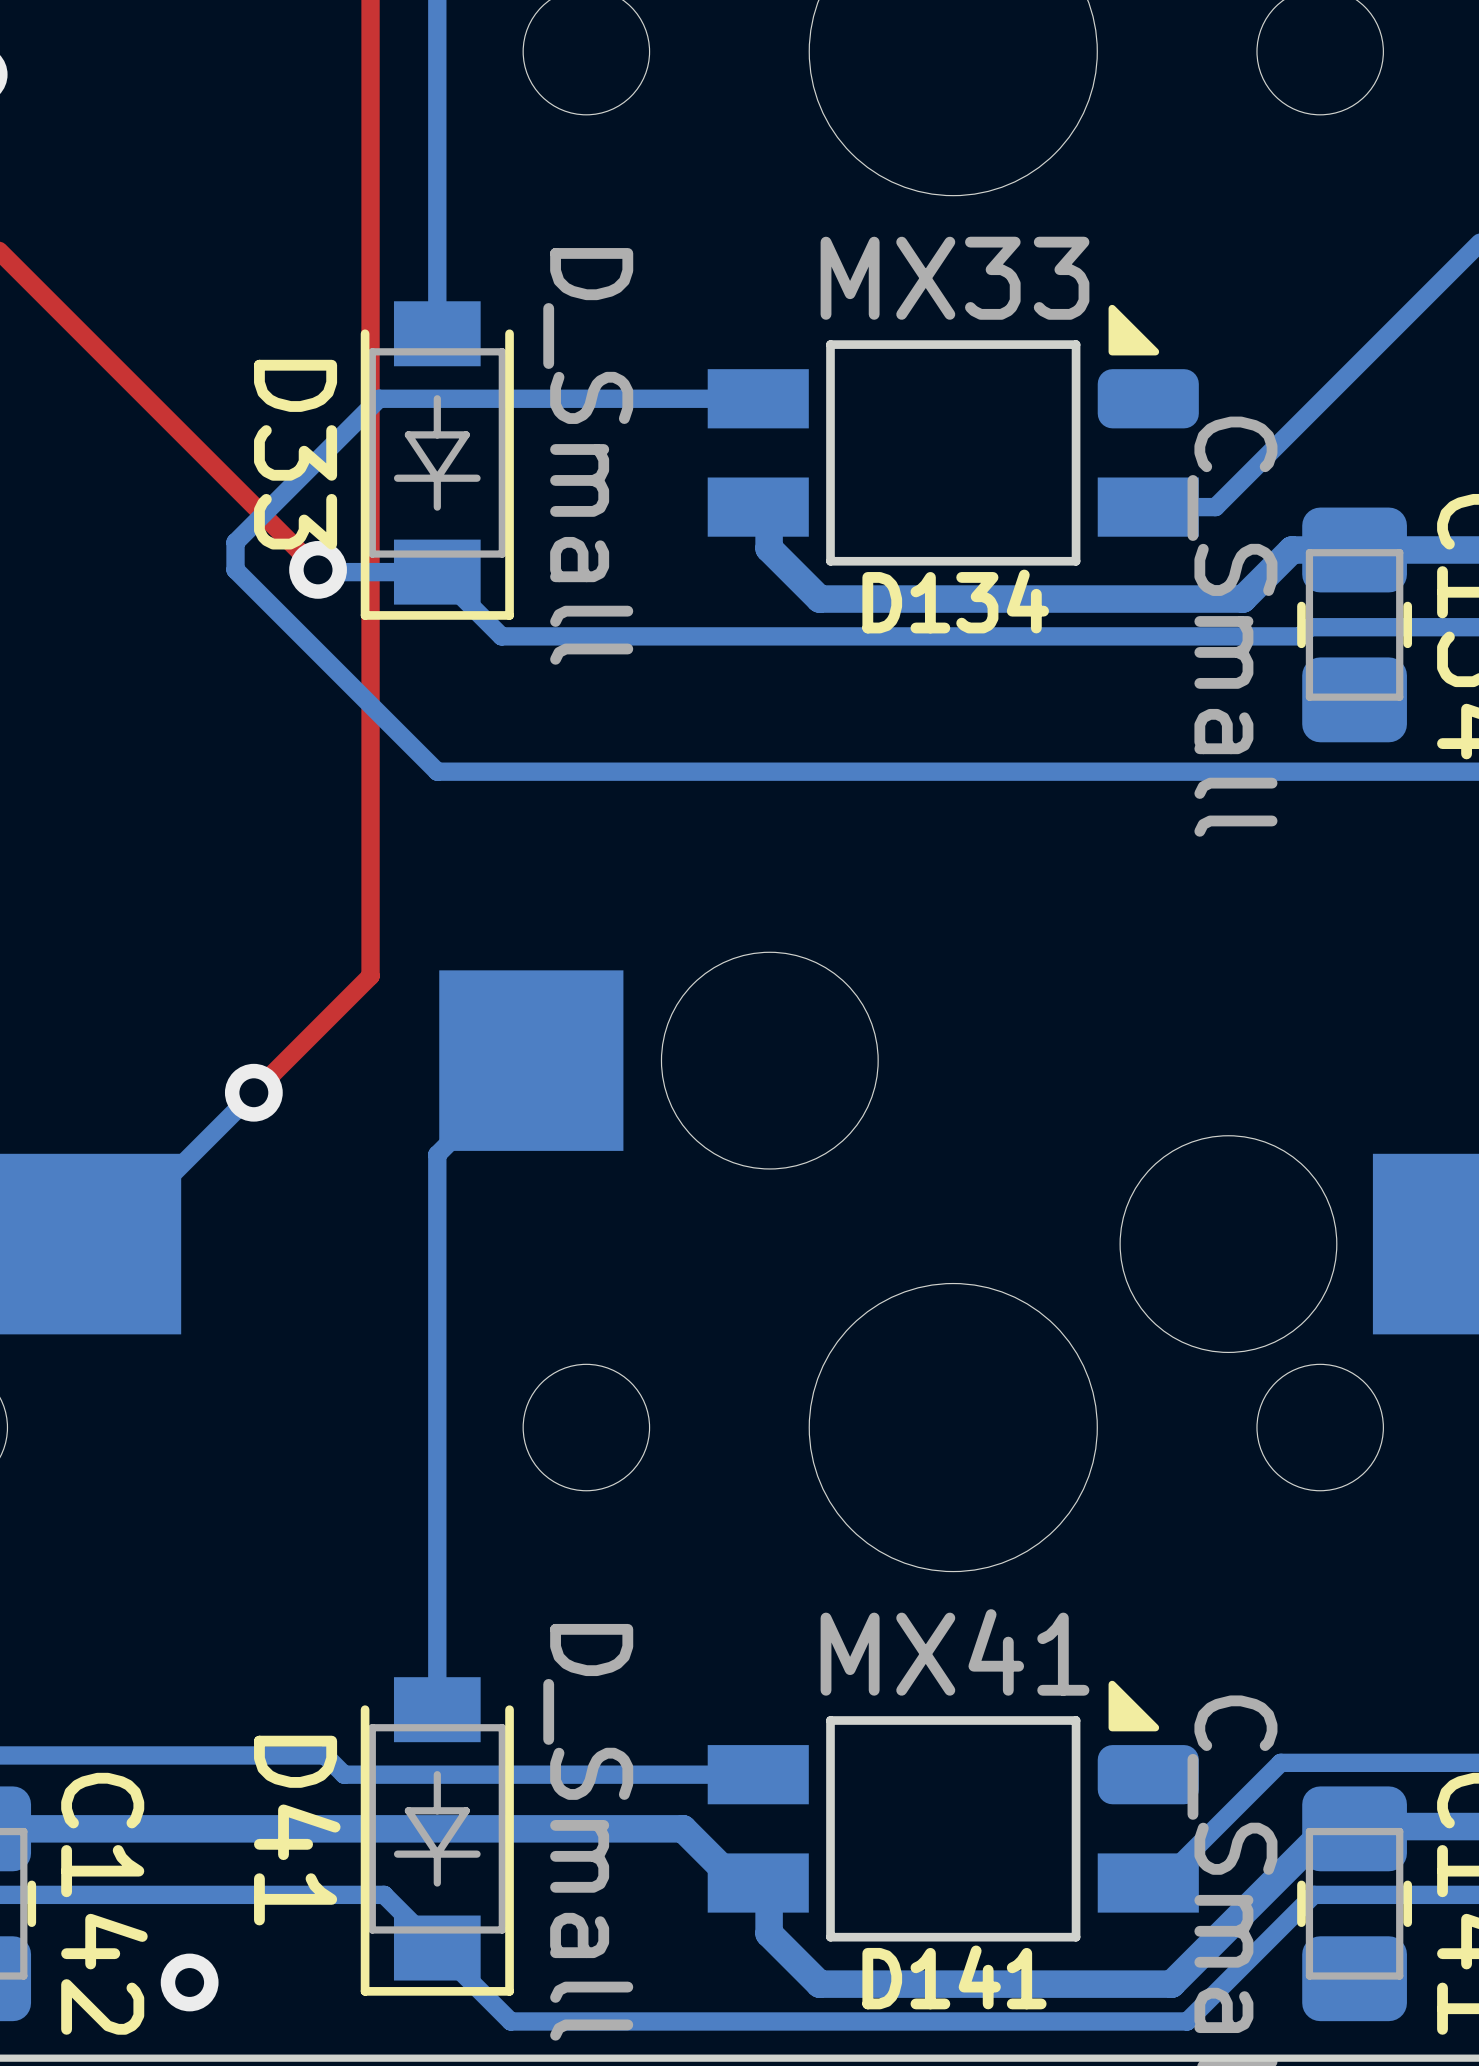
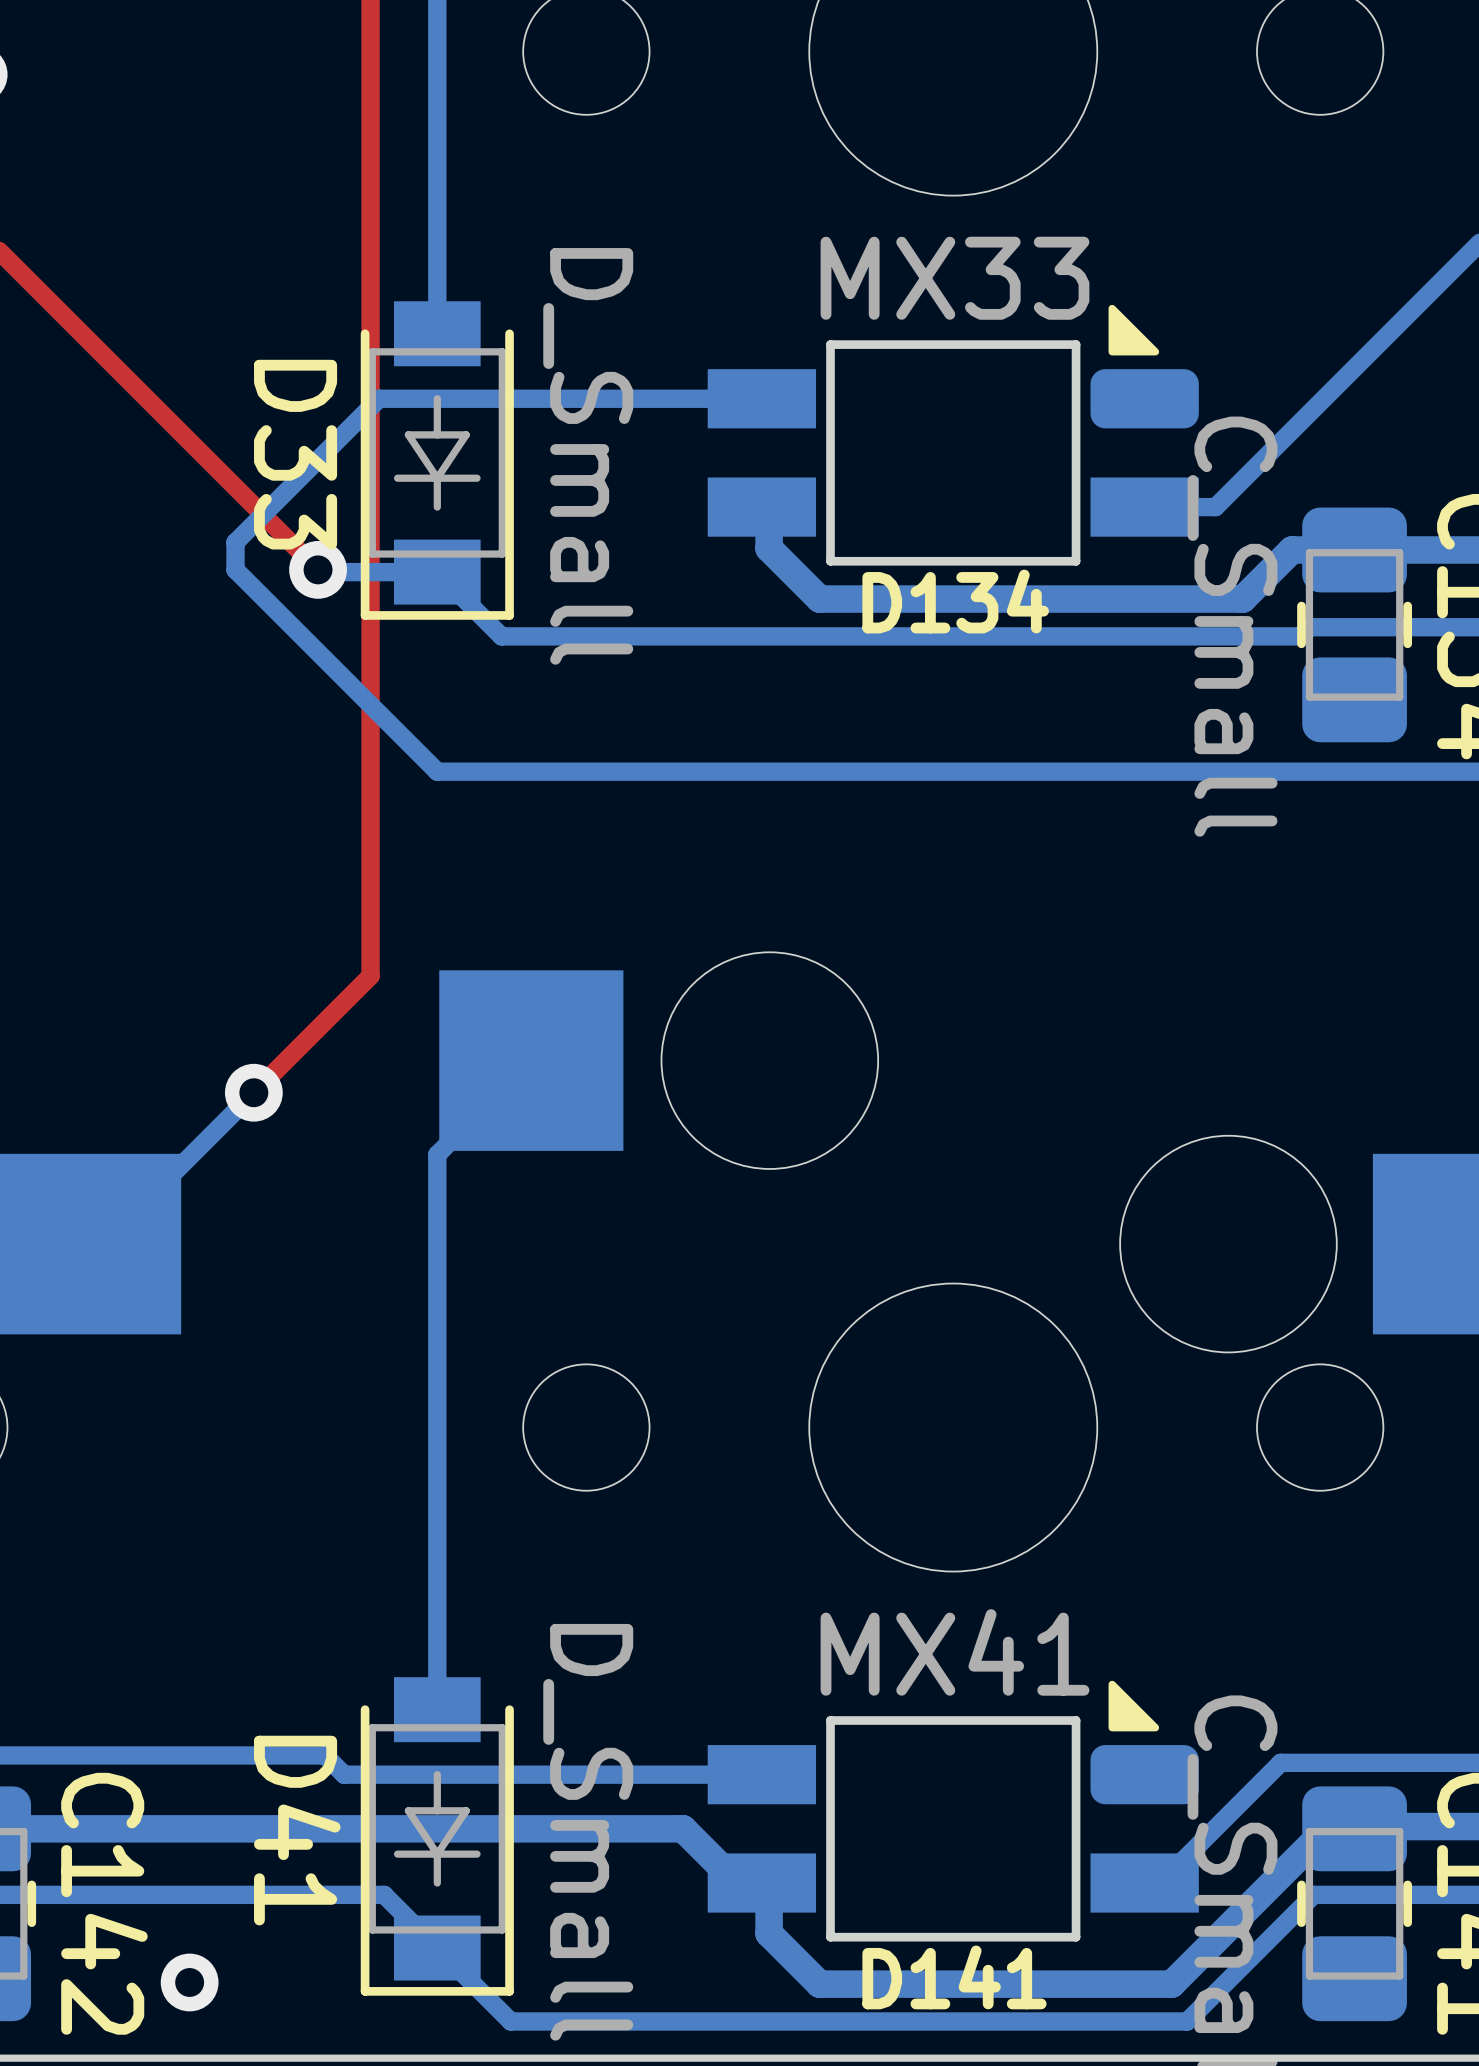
D134 footprint: [707, 304, 1199, 566] -> [707, 304, 1199, 566]
D141 footprint: [707, 1680, 1199, 1942] -> [707, 1680, 1199, 1942]

